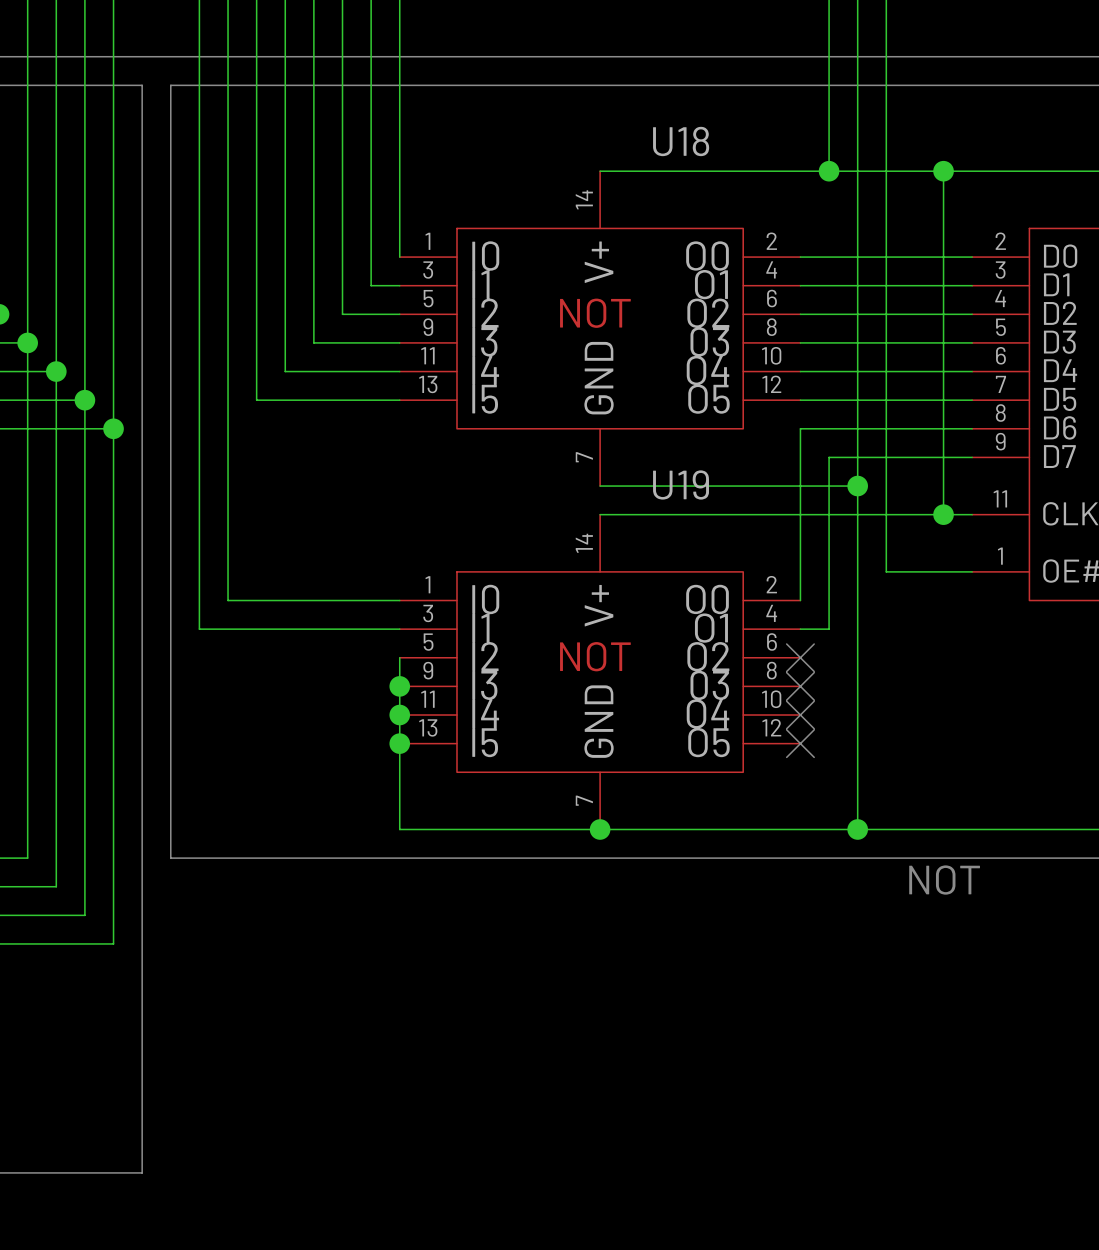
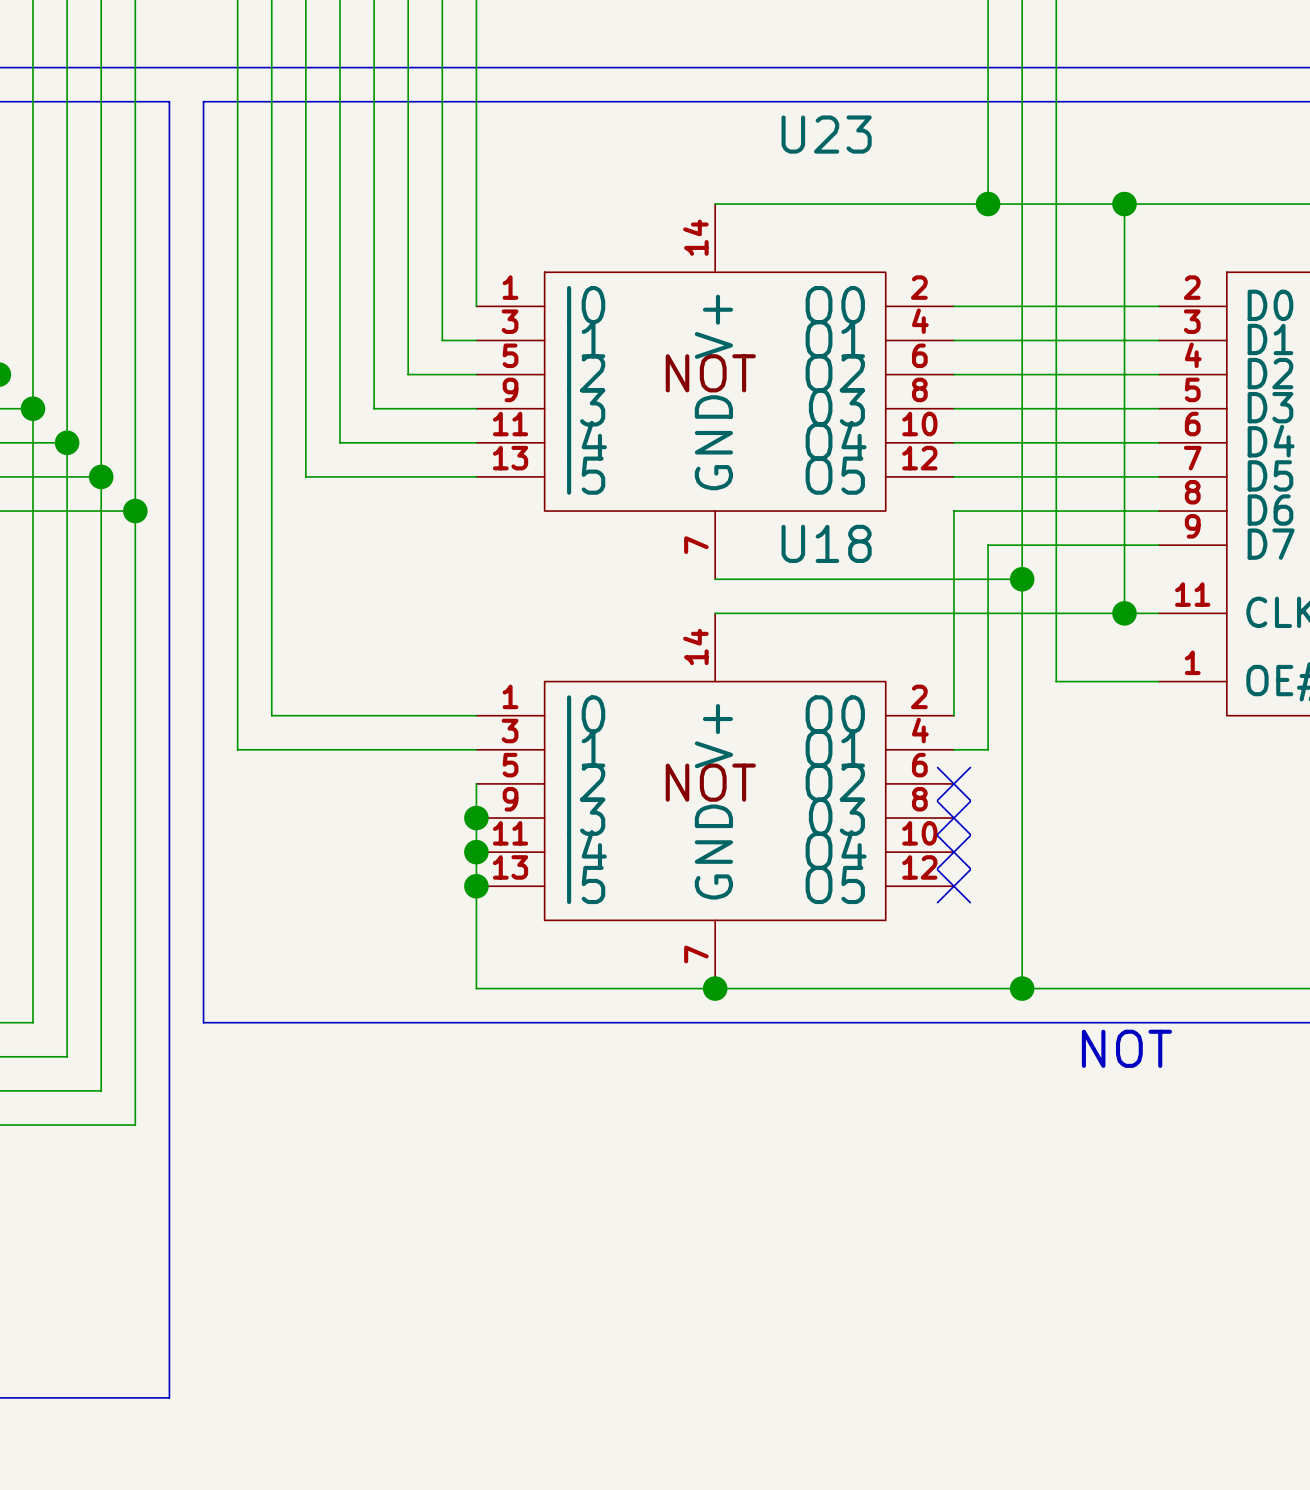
U18 name: U18 (681, 141) -> U23 (826, 134)
U19 name: U19 (681, 484) -> U18 (826, 543)

